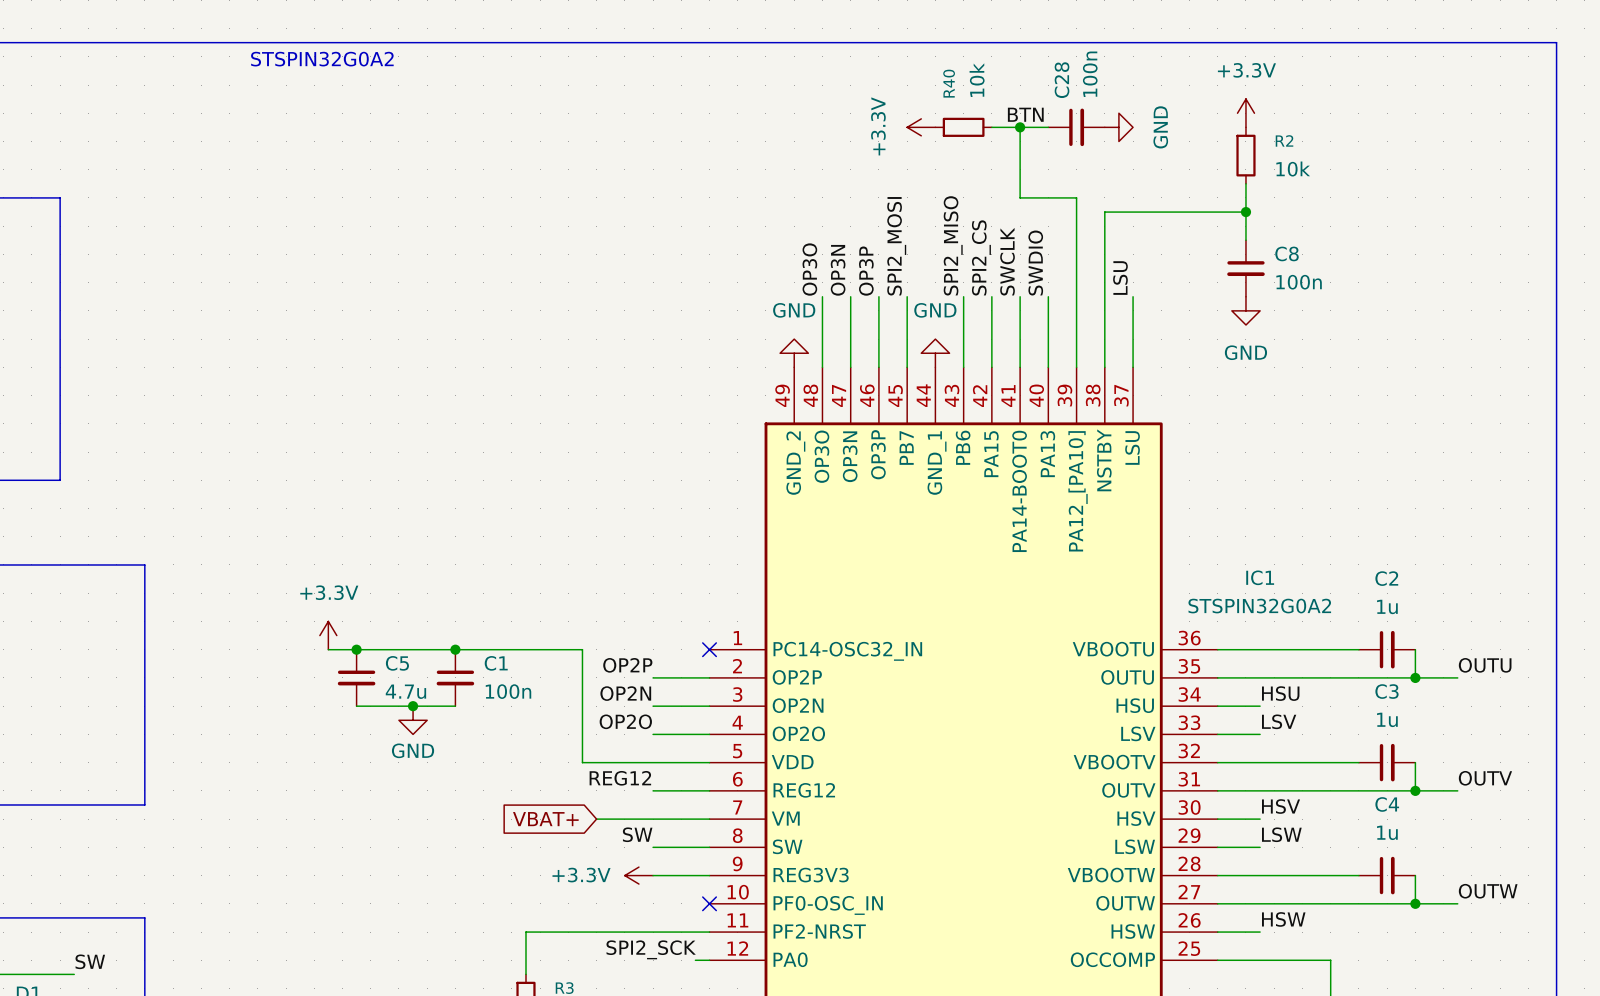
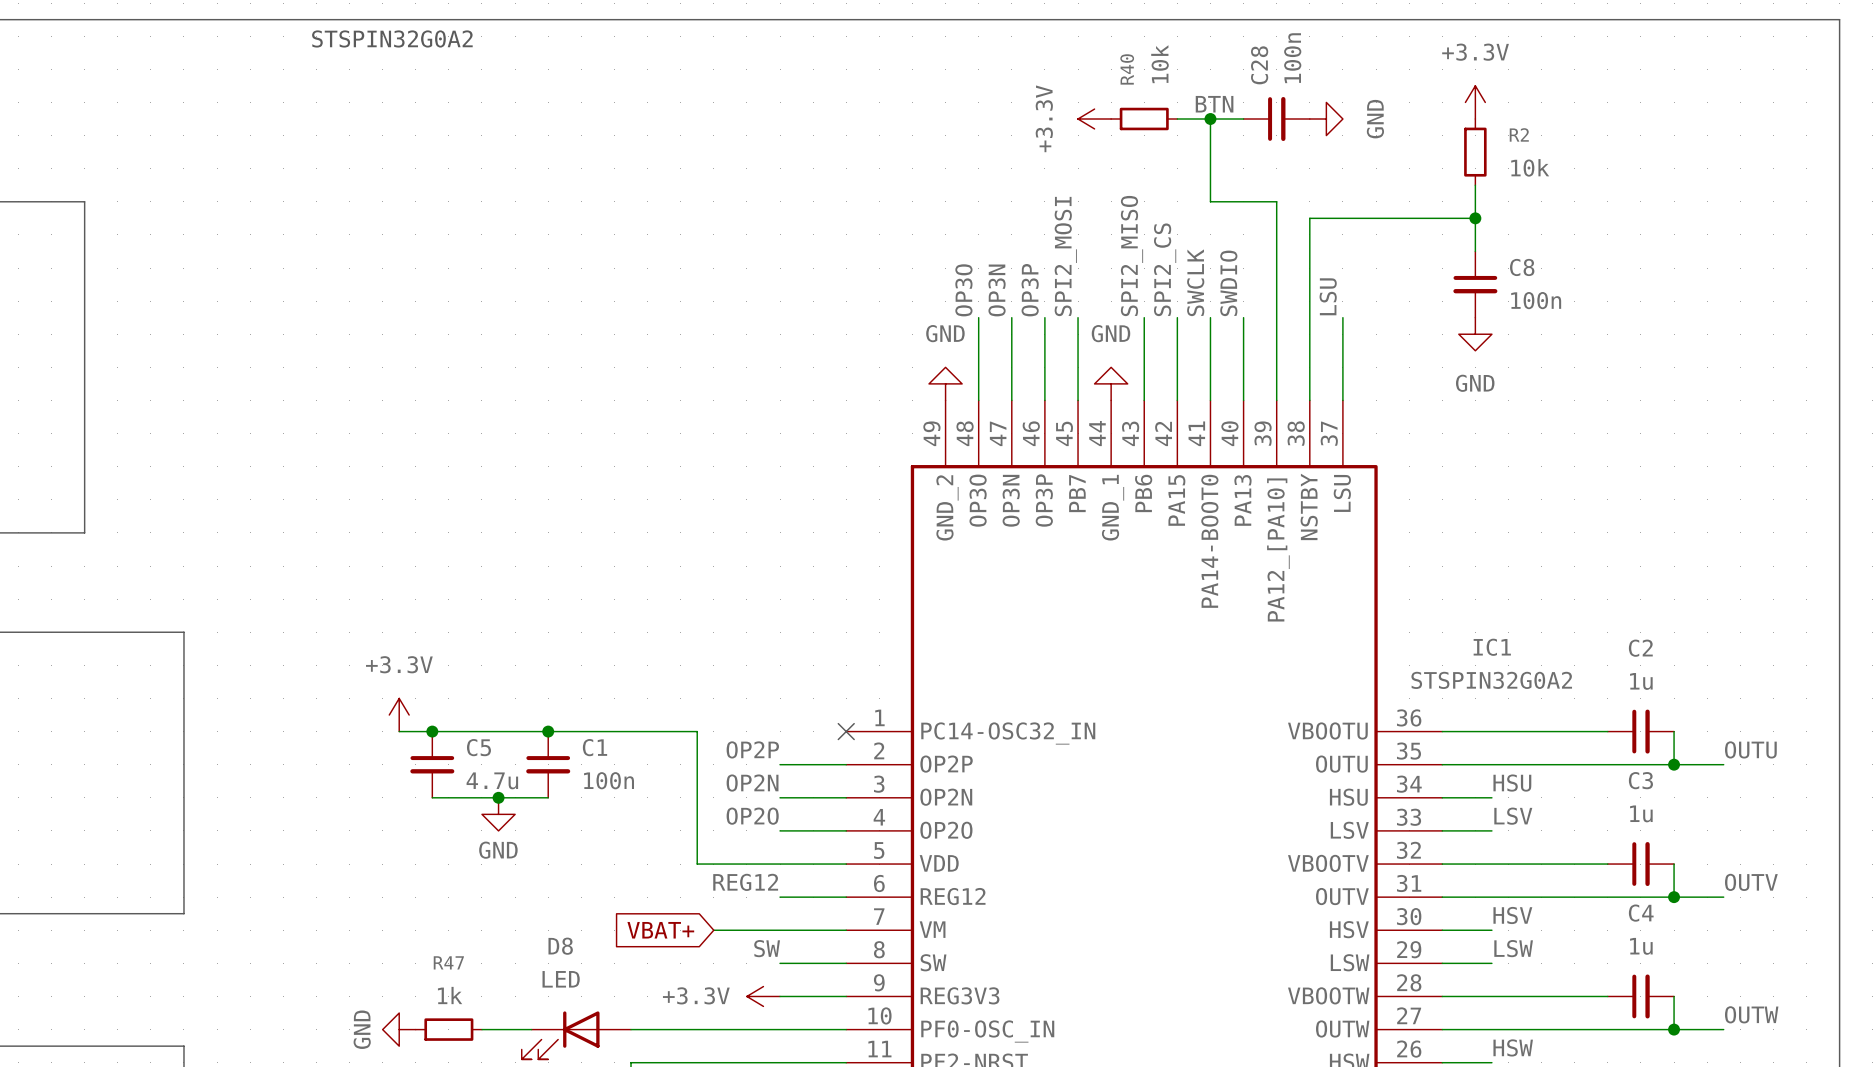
power symbol: none -> GND (399, 1029)
R47: none -> 1k (448, 1029)
wire: none -> (481, 1029) (531, 1029)
wire: none -> (631, 1029) (846, 1029)
no-connect mark: (709, 903) -> none
D8: none -> LED (576, 1035)

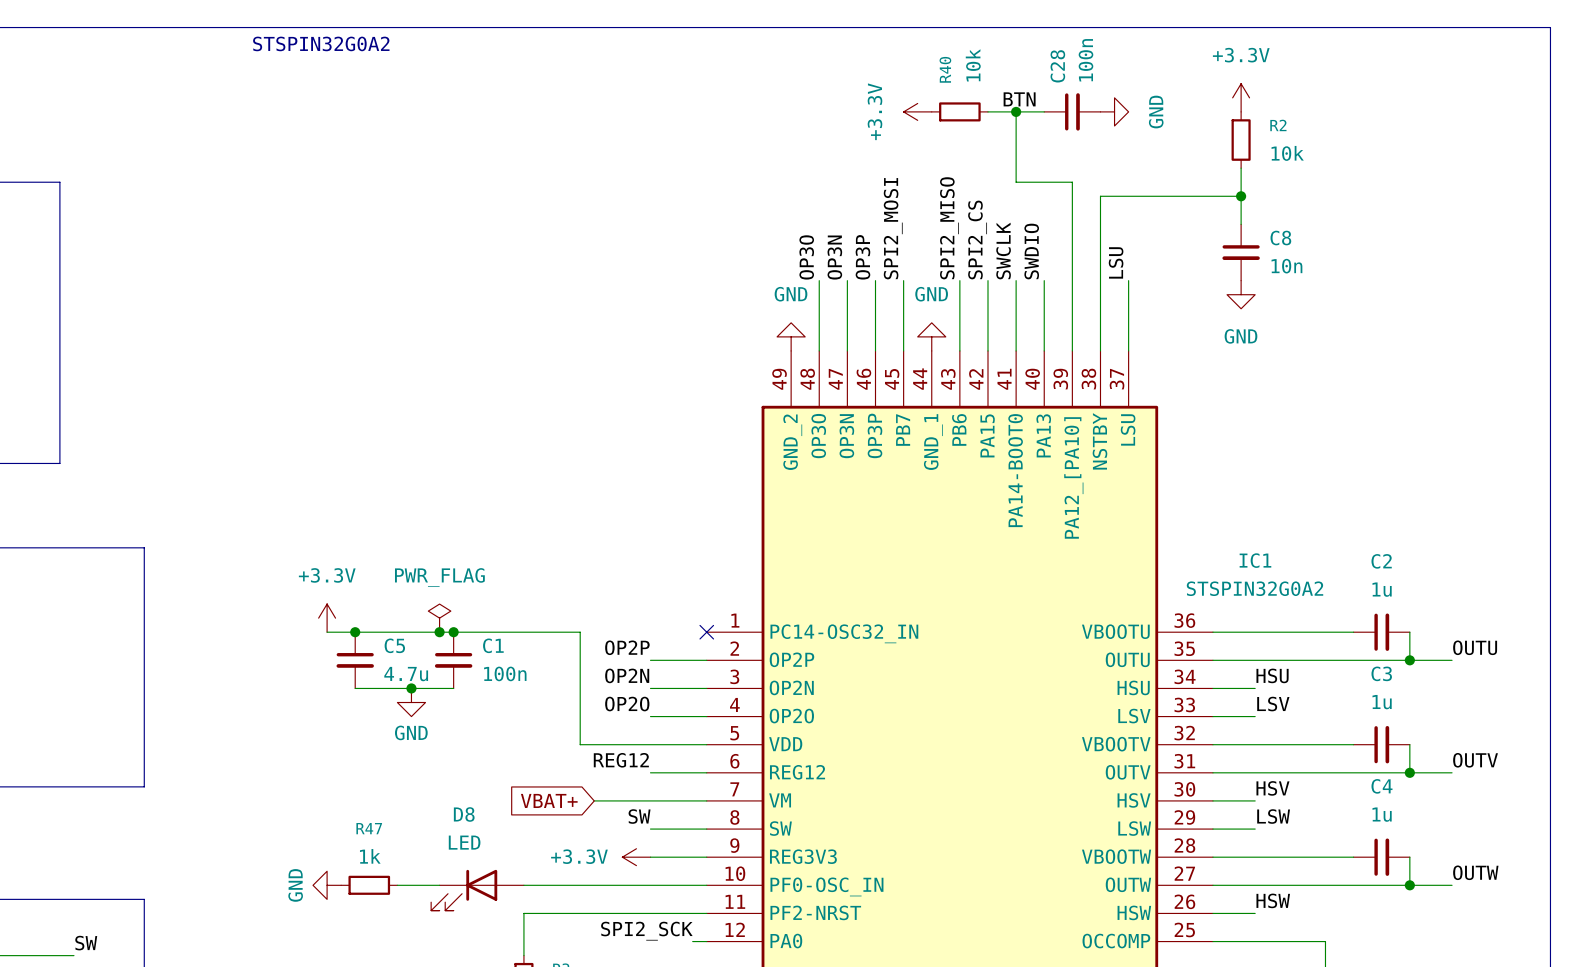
C8 value: 100n (1536, 300) -> 10n (1286, 266)
power symbol: none -> PWR_FLAG (439, 618)
junction: none -> (439, 632)

